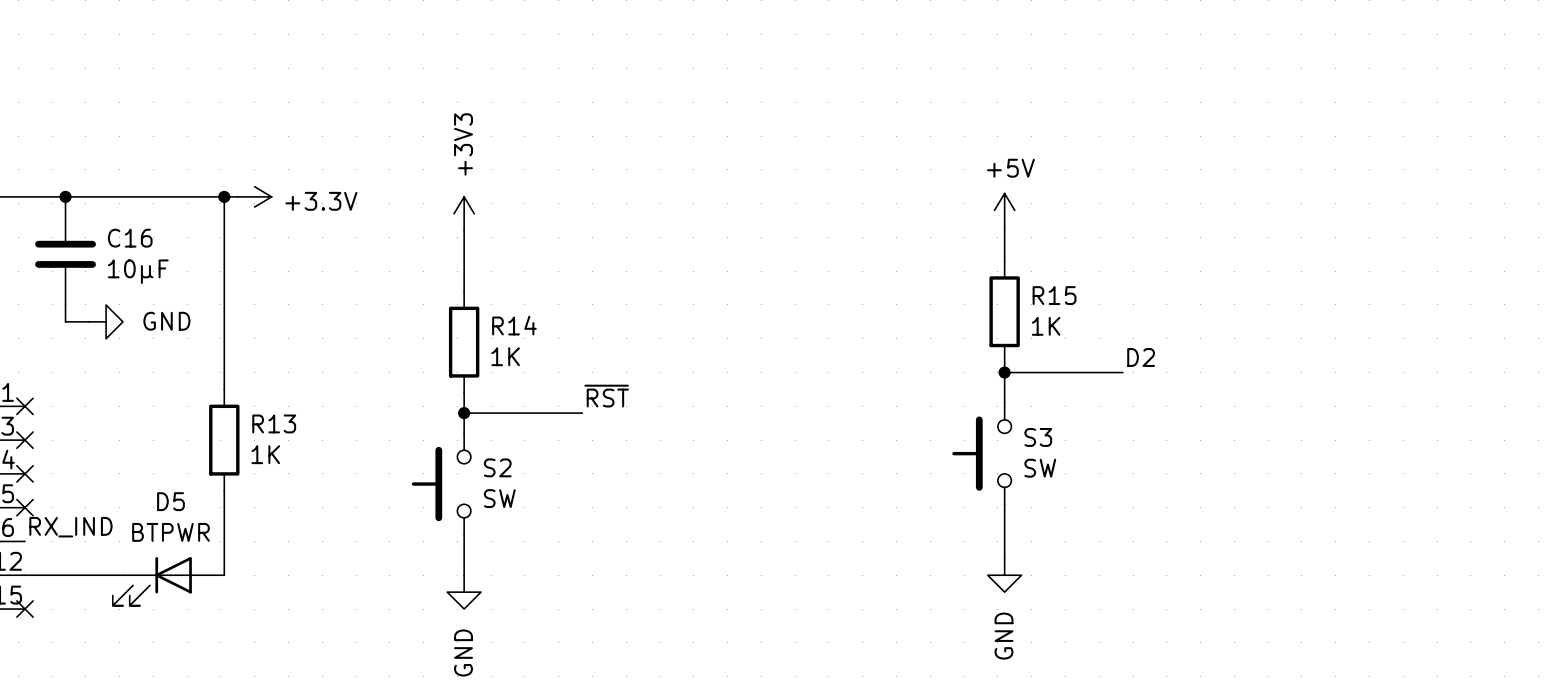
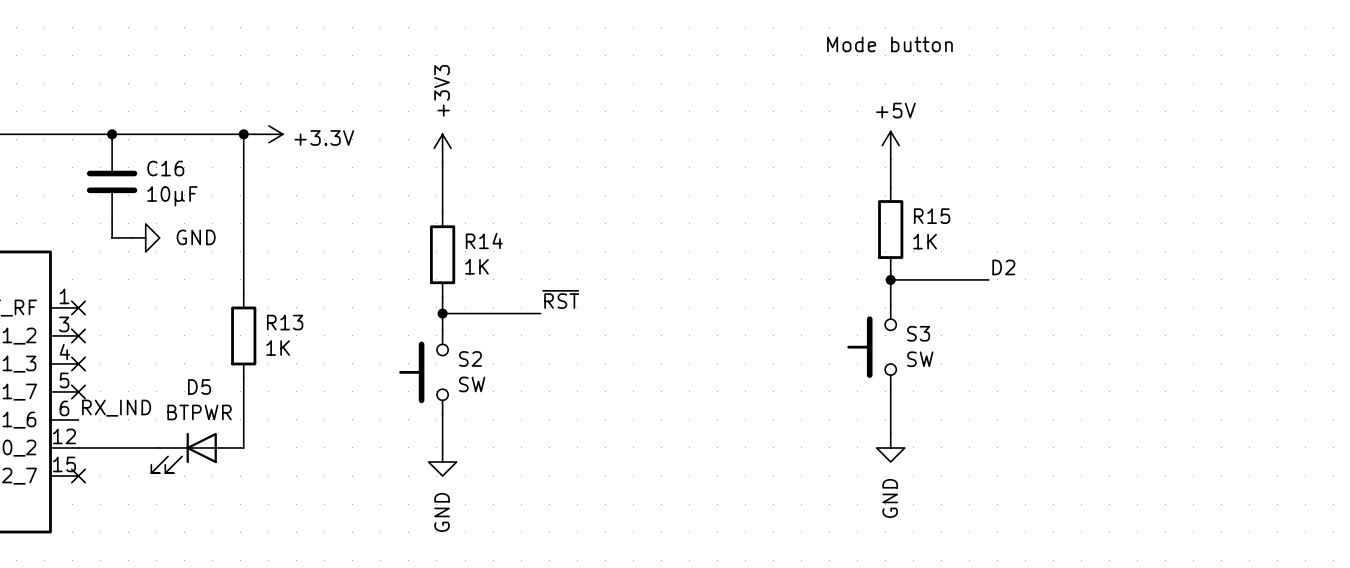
text: none -> Mode button (889, 44)

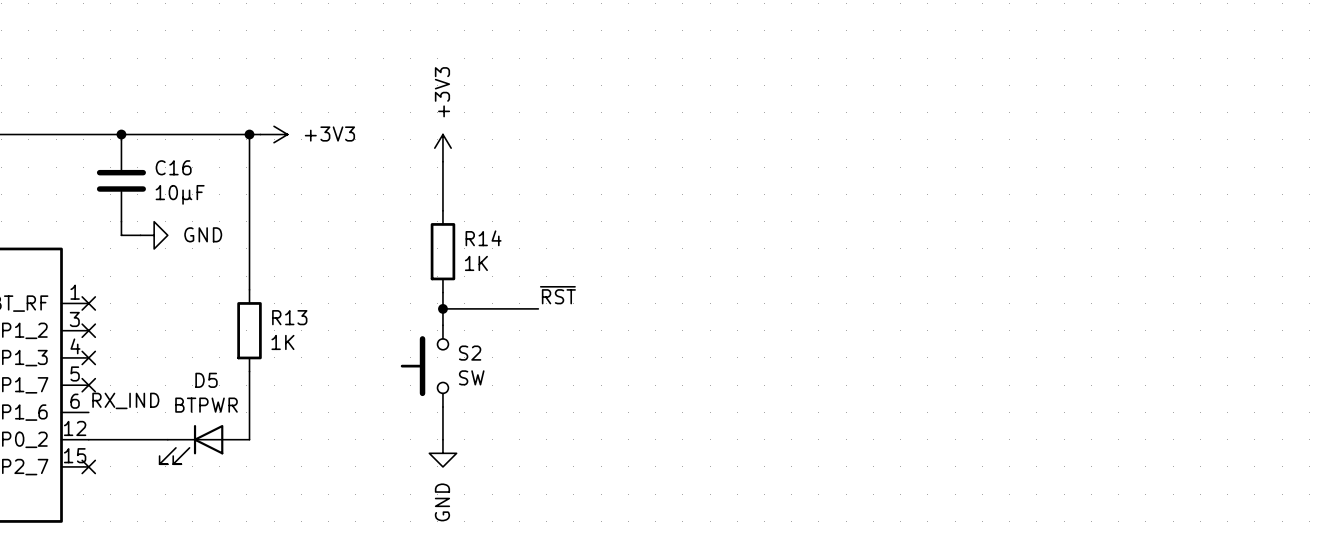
text: Mode button (889, 44) -> none
power symbol: +3.3V (268, 134) -> +3V3 (274, 134)
power symbol: +5V (890, 145) -> none
wire: (890, 159) (890, 187) -> none
R15: 1K (890, 229) -> none
label: D2 (1003, 267) -> none
wire: (890, 271) (890, 305) -> none
wire: (890, 279) (988, 279) -> none
junction: (890, 279) -> none
S3: SW (871, 347) -> none
wire: (890, 389) (890, 433) -> none
power symbol: GND (890, 447) -> none

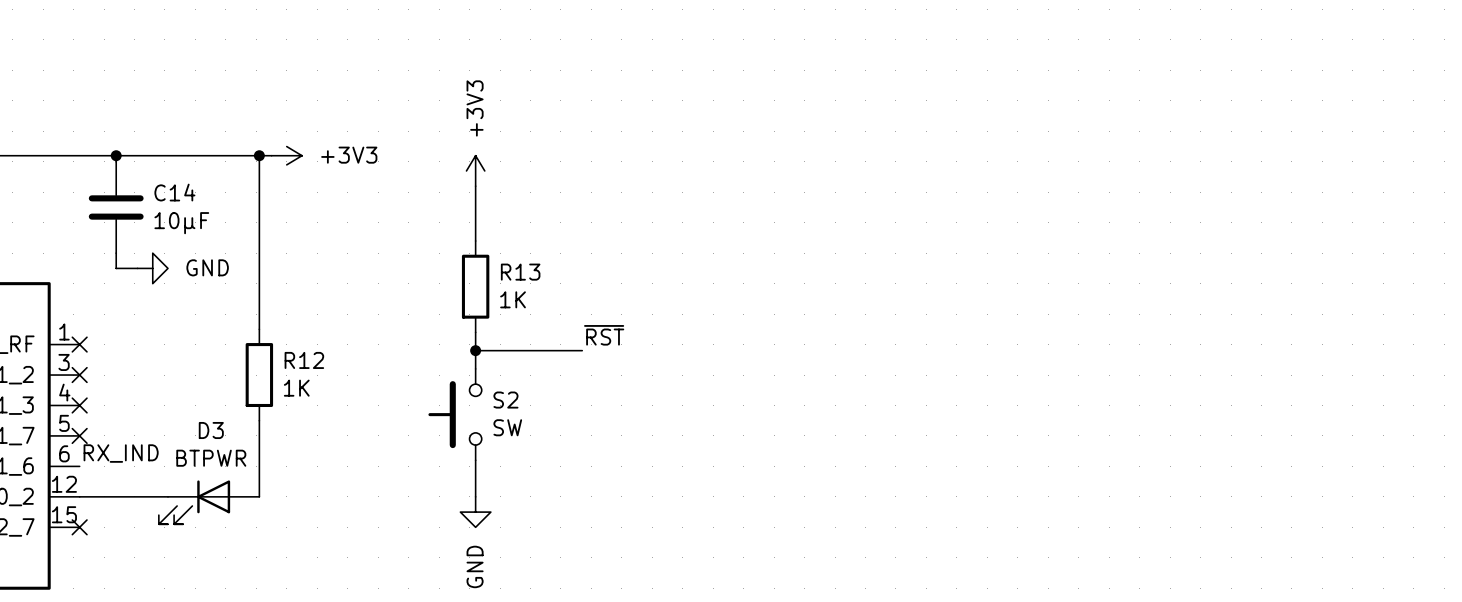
C16 name: C16 (173, 167) -> C14 (174, 192)
R14 name: R14 (483, 238) -> R13 (520, 272)
R13 name: R13 (289, 317) -> R12 (304, 360)
D5 name: D5 (206, 380) -> D3 (211, 430)

